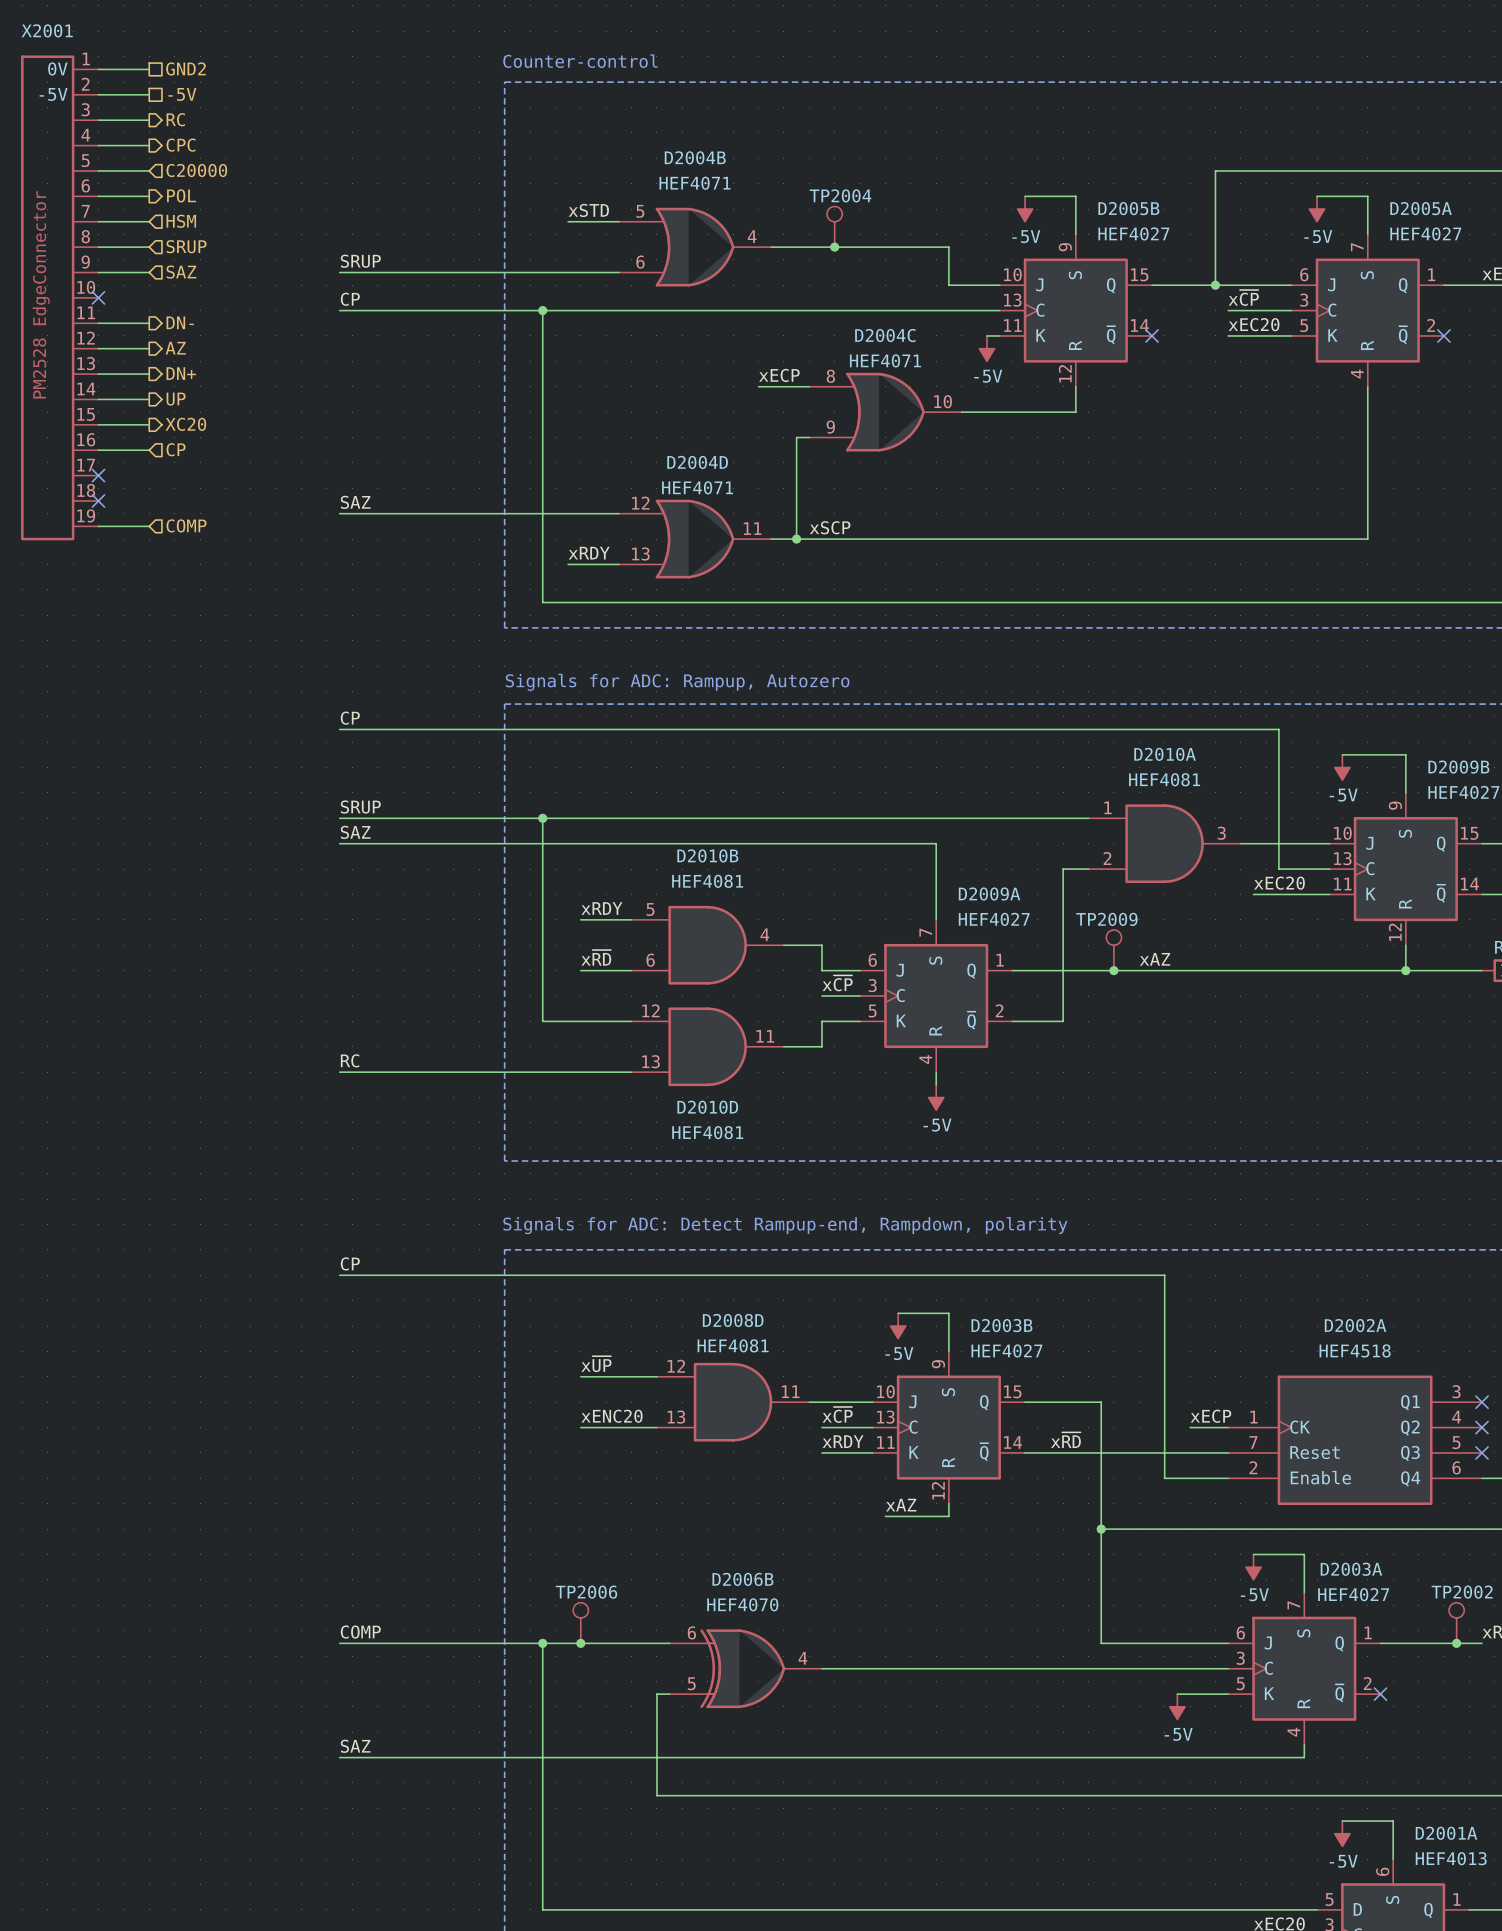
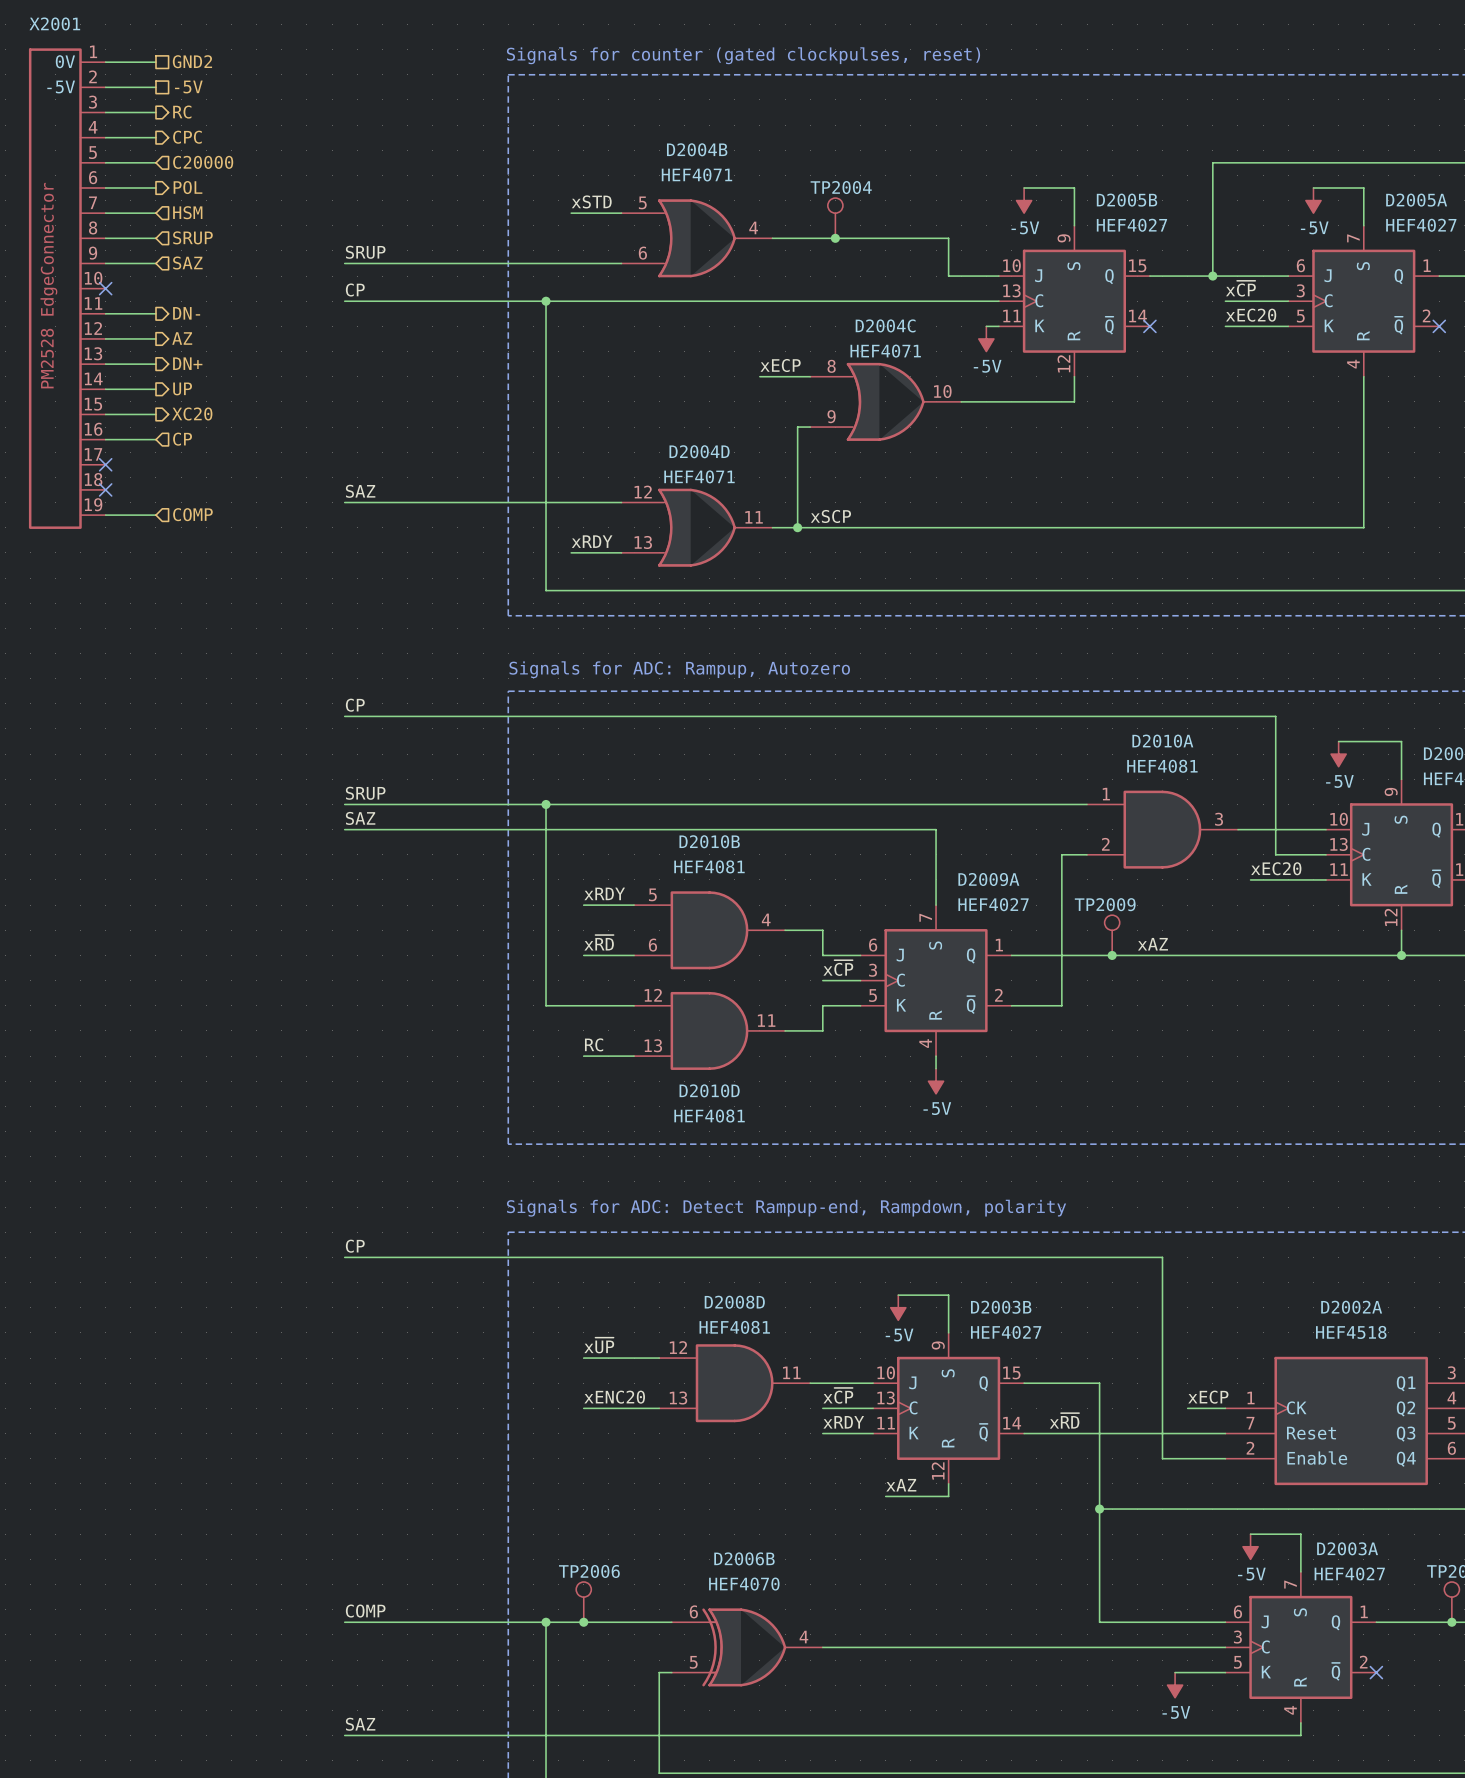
text: Counter-control (580, 61) -> Signals for counter (gated clockpulses, reset) (743, 55)
label position: RC (350, 1060) -> RC (594, 1044)
wire: (339, 1072) (580, 1072) -> none

